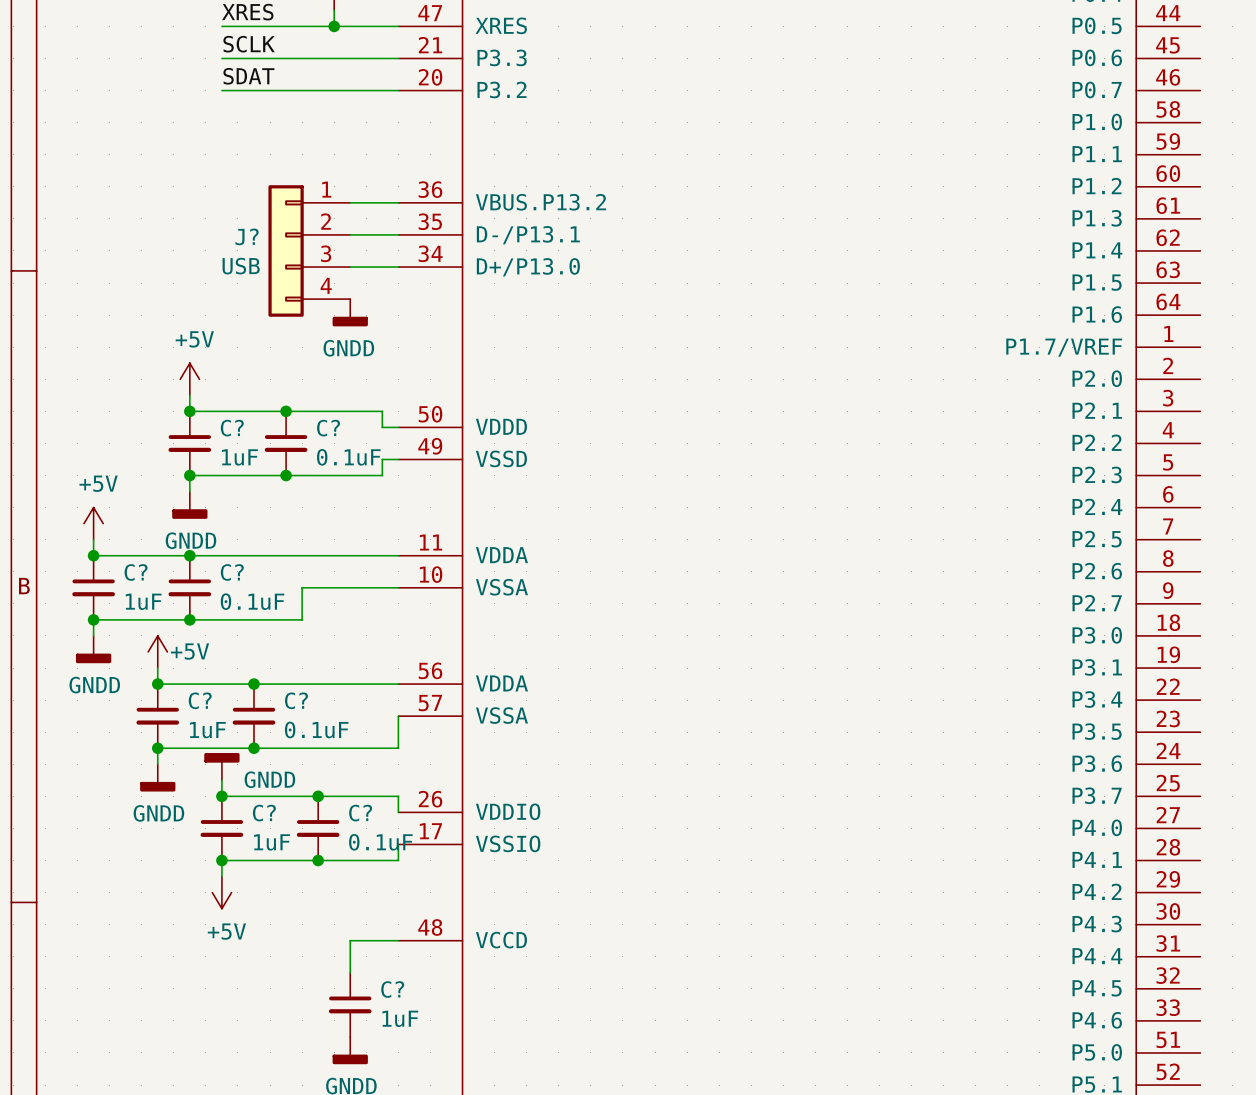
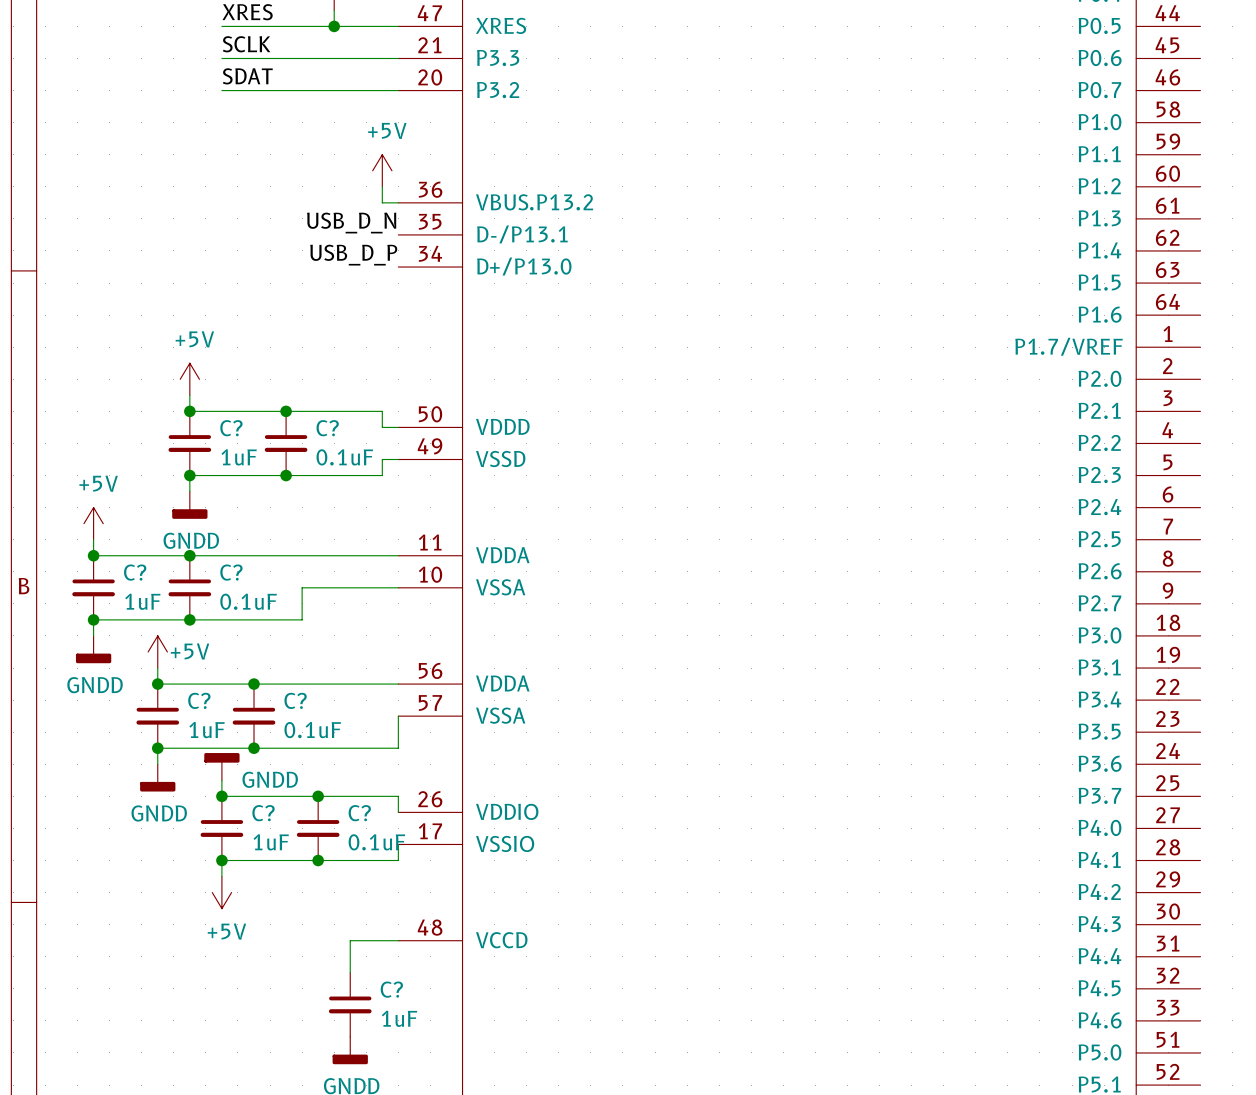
power symbol: none -> +5V (382, 170)
wire: (350, 202) (382, 202) -> (382, 186) (382, 202)
label: none -> USB_D_N (351, 223)
wire: (350, 234) (398, 234) -> none
J?: USB (309, 250) -> none
label: none -> USB_D_P (353, 255)
wire: (350, 267) (398, 267) -> none
power symbol: GNDD (350, 312) -> none

